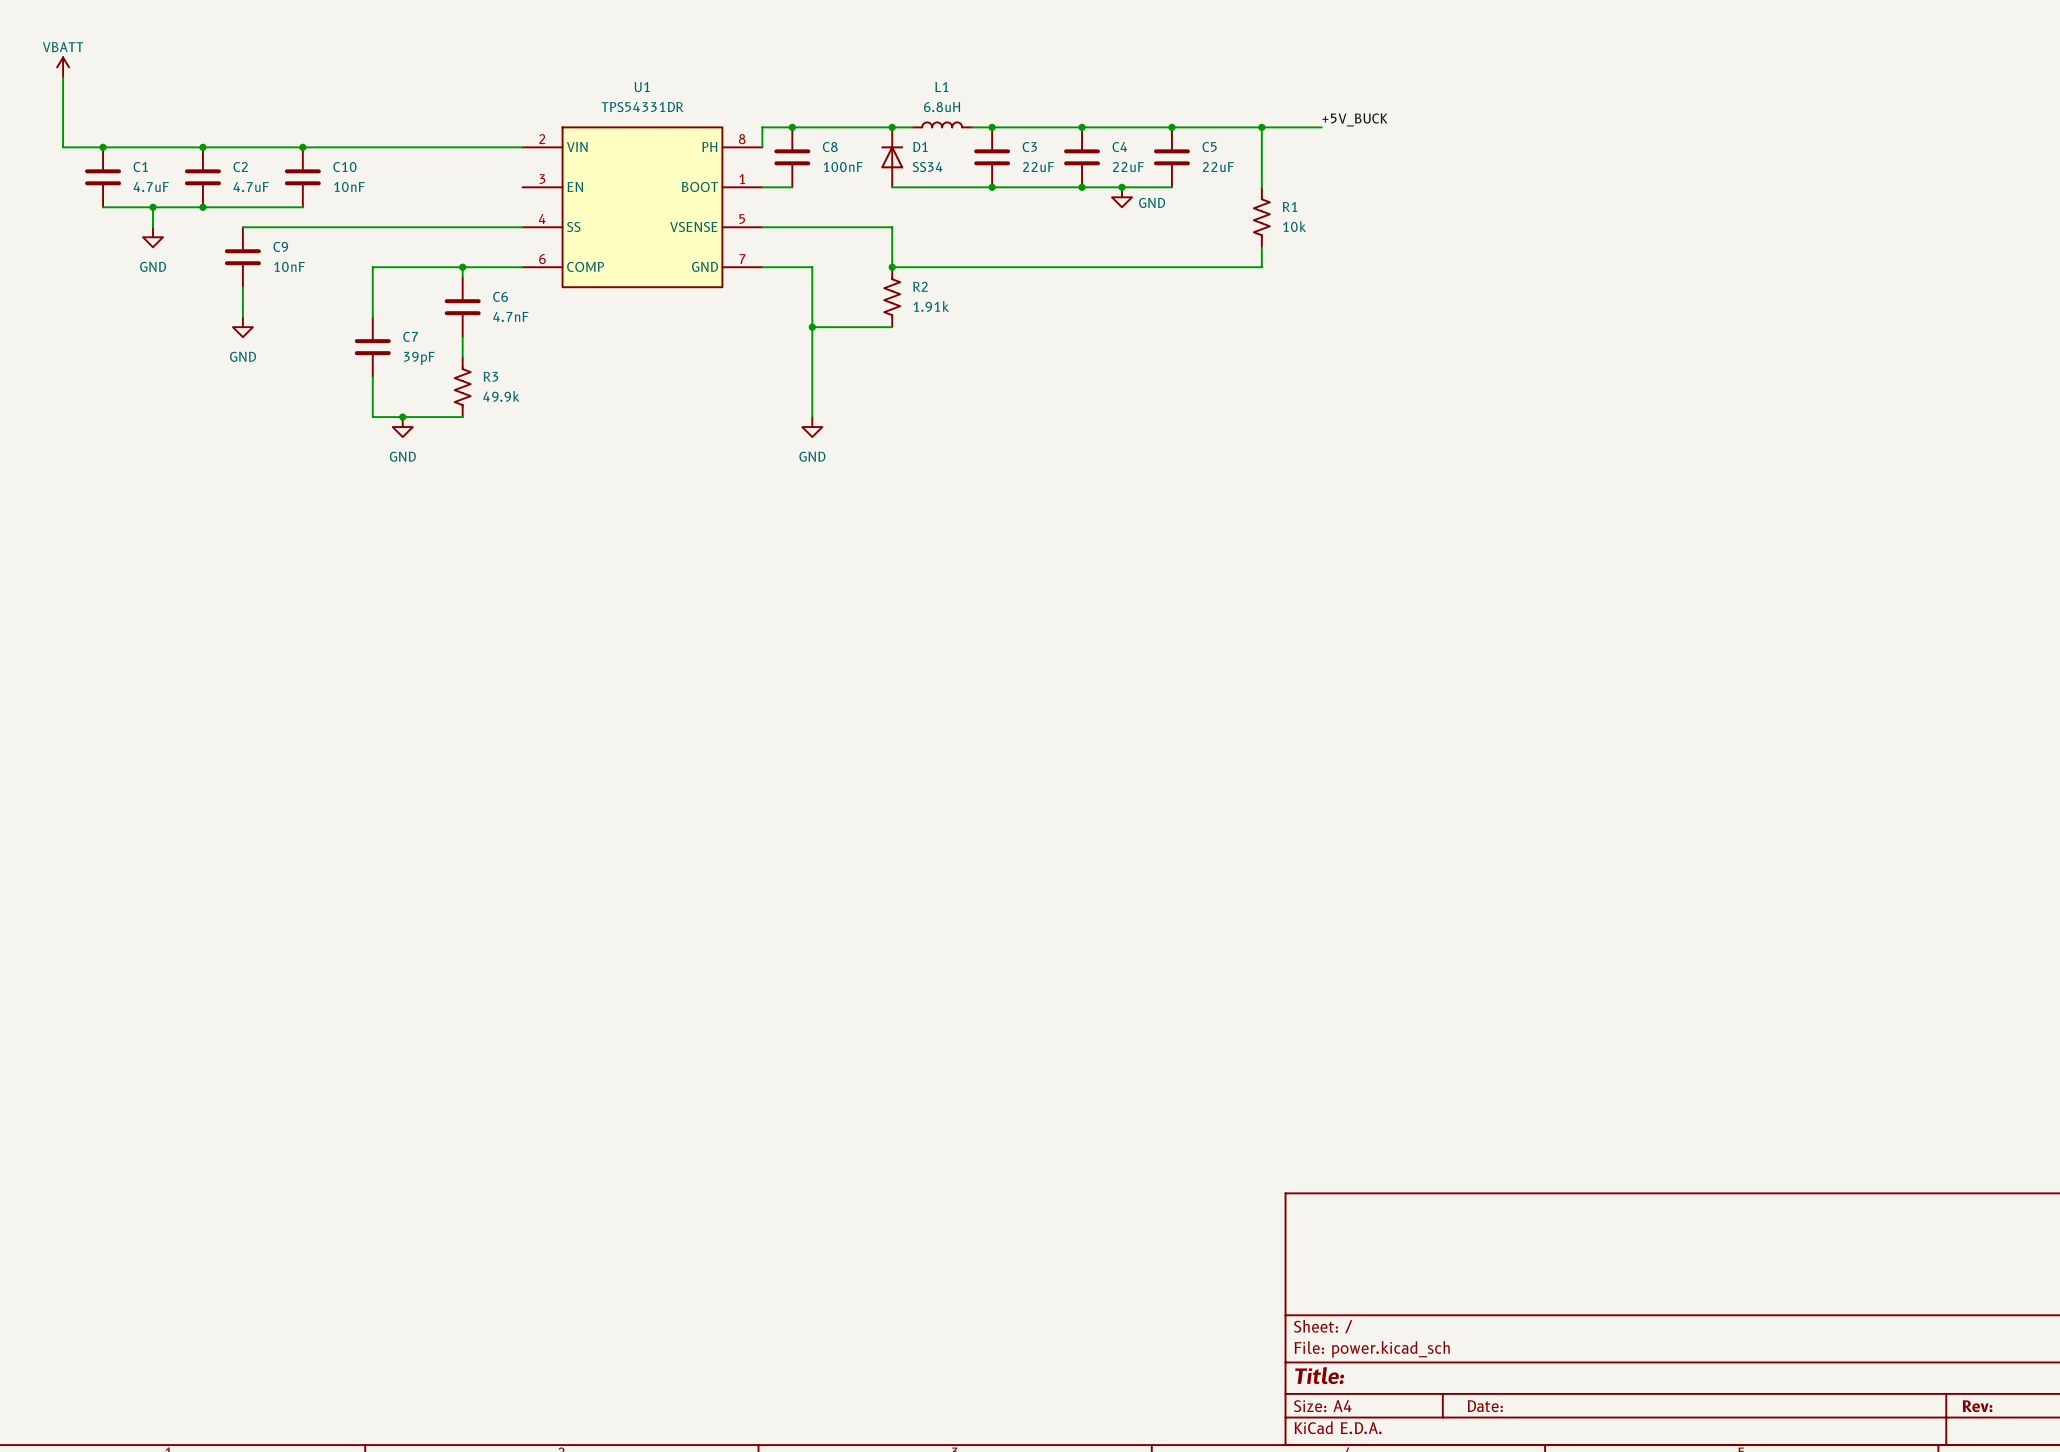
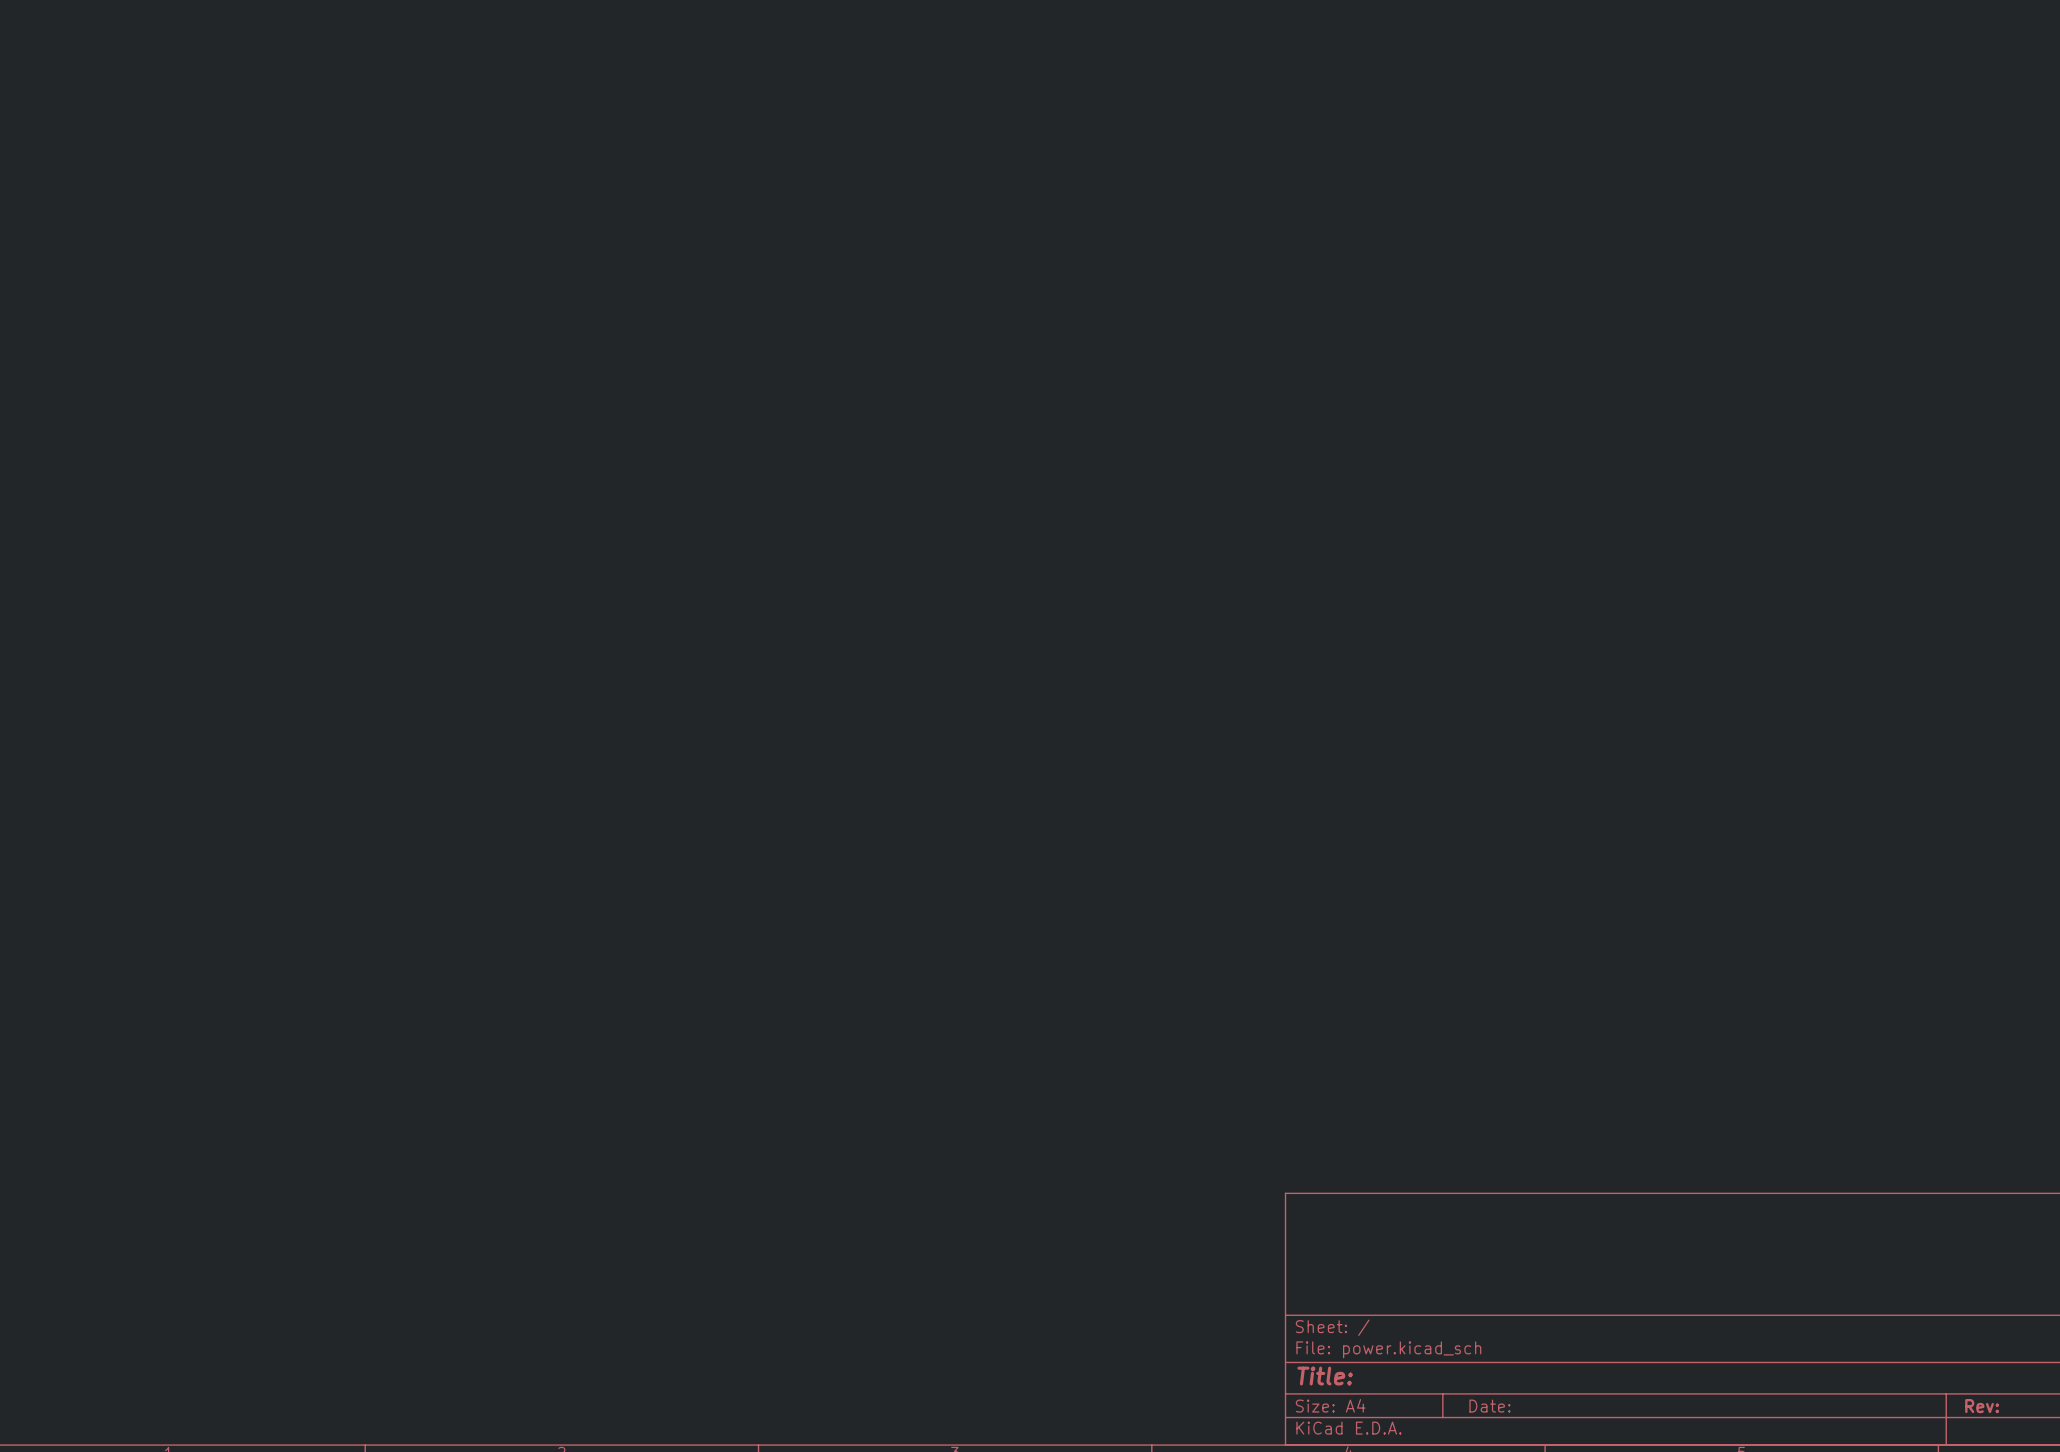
power symbol: VBATT (63, 67) -> none
wire: (63, 77) (63, 147) (522, 147) -> none
label: +5V_BUCK (1354, 119) -> none
L1: 6.8uH (942, 124) -> none
junction: (792, 127) -> none
junction: (892, 127) -> none
wire: (912, 127) (762, 127) (762, 147) -> none
wire: (972, 127) (1321, 127) -> none
junction: (992, 127) -> none
junction: (1082, 127) -> none
junction: (1171, 127) -> none
wire: (1261, 127) (1261, 187) -> none
junction: (1261, 127) -> none
junction: (103, 147) -> none
junction: (202, 147) -> none
junction: (302, 147) -> none
C8: 100nF (792, 157) -> none
D1: SS34 (892, 157) -> none
C3: 22uF (992, 157) -> none
C4: 22uF (1082, 157) -> none
C5: 22uF (1171, 157) -> none
C1: 4.7uF (103, 177) -> none
C2: 4.7uF (202, 177) -> none
C10: 10nF (302, 177) -> none
wire: (762, 187) (792, 187) -> none
wire: (892, 187) (1171, 187) -> none
junction: (992, 187) -> none
junction: (1082, 187) -> none
junction: (1121, 187) -> none
power symbol: GND (1121, 197) -> none
wire: (103, 207) (302, 207) -> none
wire: (152, 207) (152, 227) -> none
junction: (152, 207) -> none
junction: (202, 207) -> none
U1: TPS54331DR (642, 207) -> none
R1: 10k (1261, 217) -> none
wire: (242, 227) (522, 227) -> none
wire: (762, 227) (892, 227) (892, 267) (1261, 267) (1261, 247) -> none
power symbol: GND (152, 237) -> none
C9: 10nF (242, 257) -> none
wire: (462, 267) (462, 277) -> none
junction: (462, 267) -> none
wire: (522, 267) (372, 267) (372, 317) -> none
wire: (762, 267) (812, 267) (812, 417) -> none
junction: (892, 267) -> none
wire: (242, 287) (242, 317) -> none
R2: 1.91k (892, 297) -> none
C6: 4.7nF (462, 307) -> none
power symbol: GND (242, 327) -> none
wire: (812, 327) (892, 327) -> none
junction: (812, 327) -> none
wire: (462, 337) (462, 357) -> none
C7: 39pF (372, 347) -> none
wire: (372, 377) (372, 417) (462, 417) -> none
R3: 49.9k (462, 387) -> none
junction: (402, 417) -> none
power symbol: GND (402, 427) -> none
power symbol: GND (812, 427) -> none

